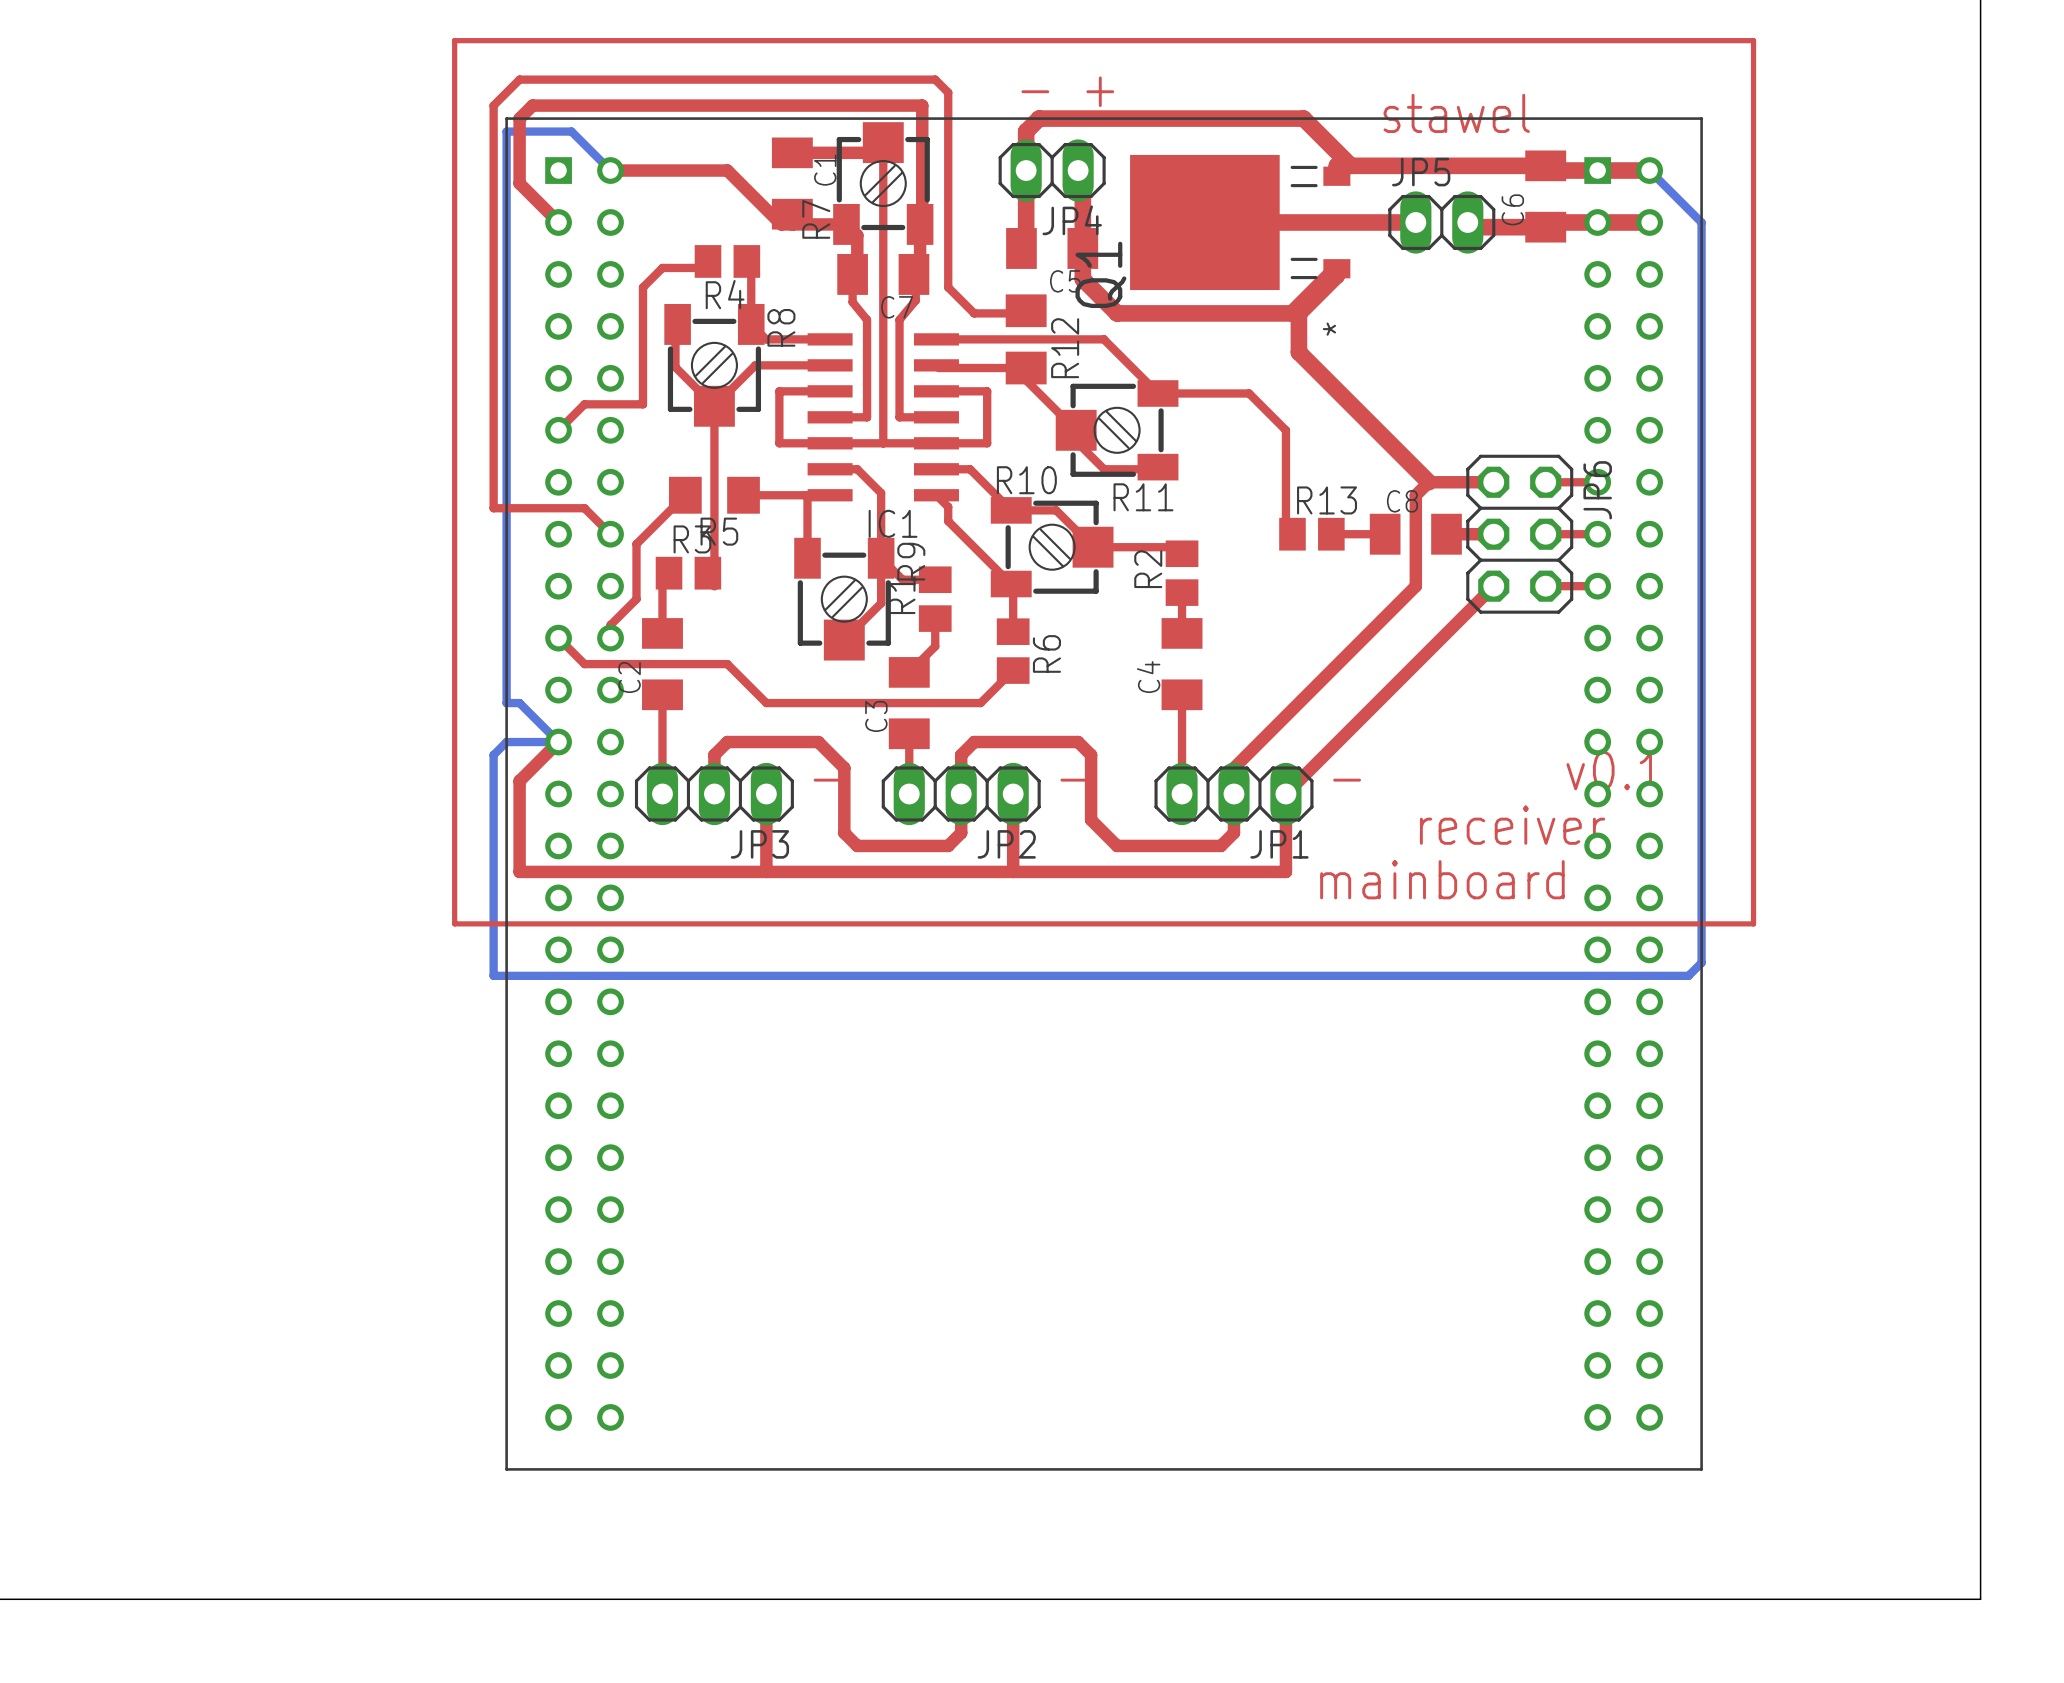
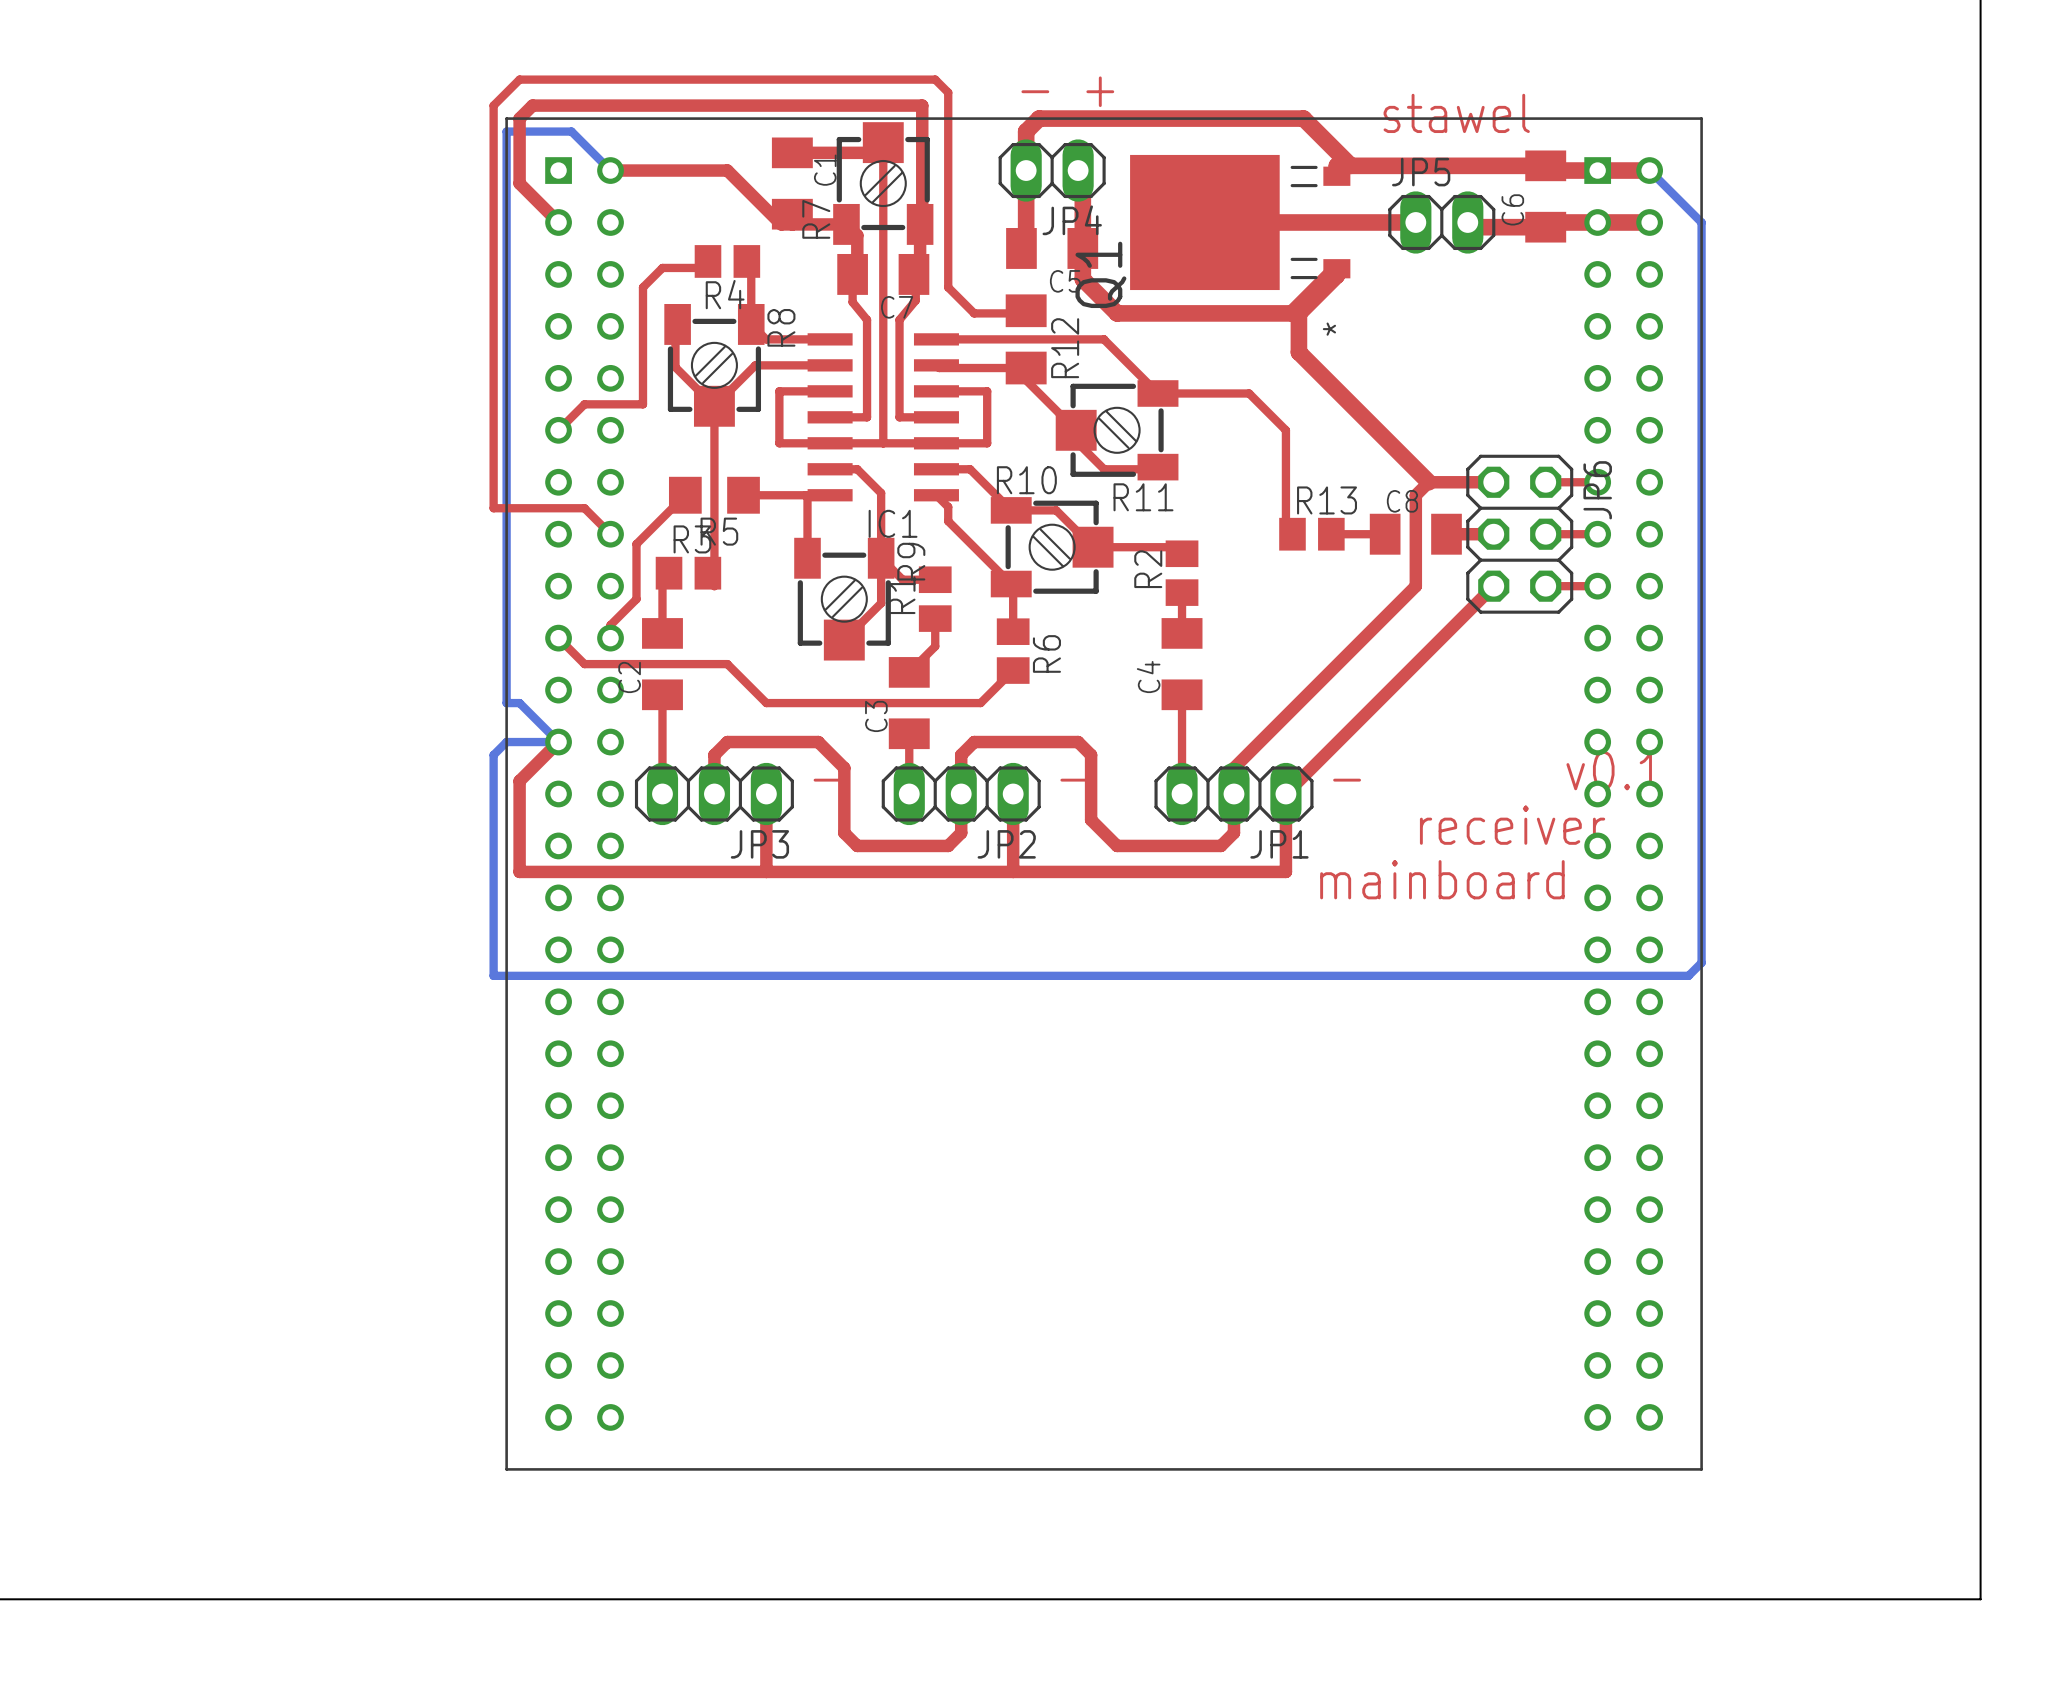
top track: (454, 40) (454, 923) (1753, 923) (1753, 40) (454, 40) -> none

